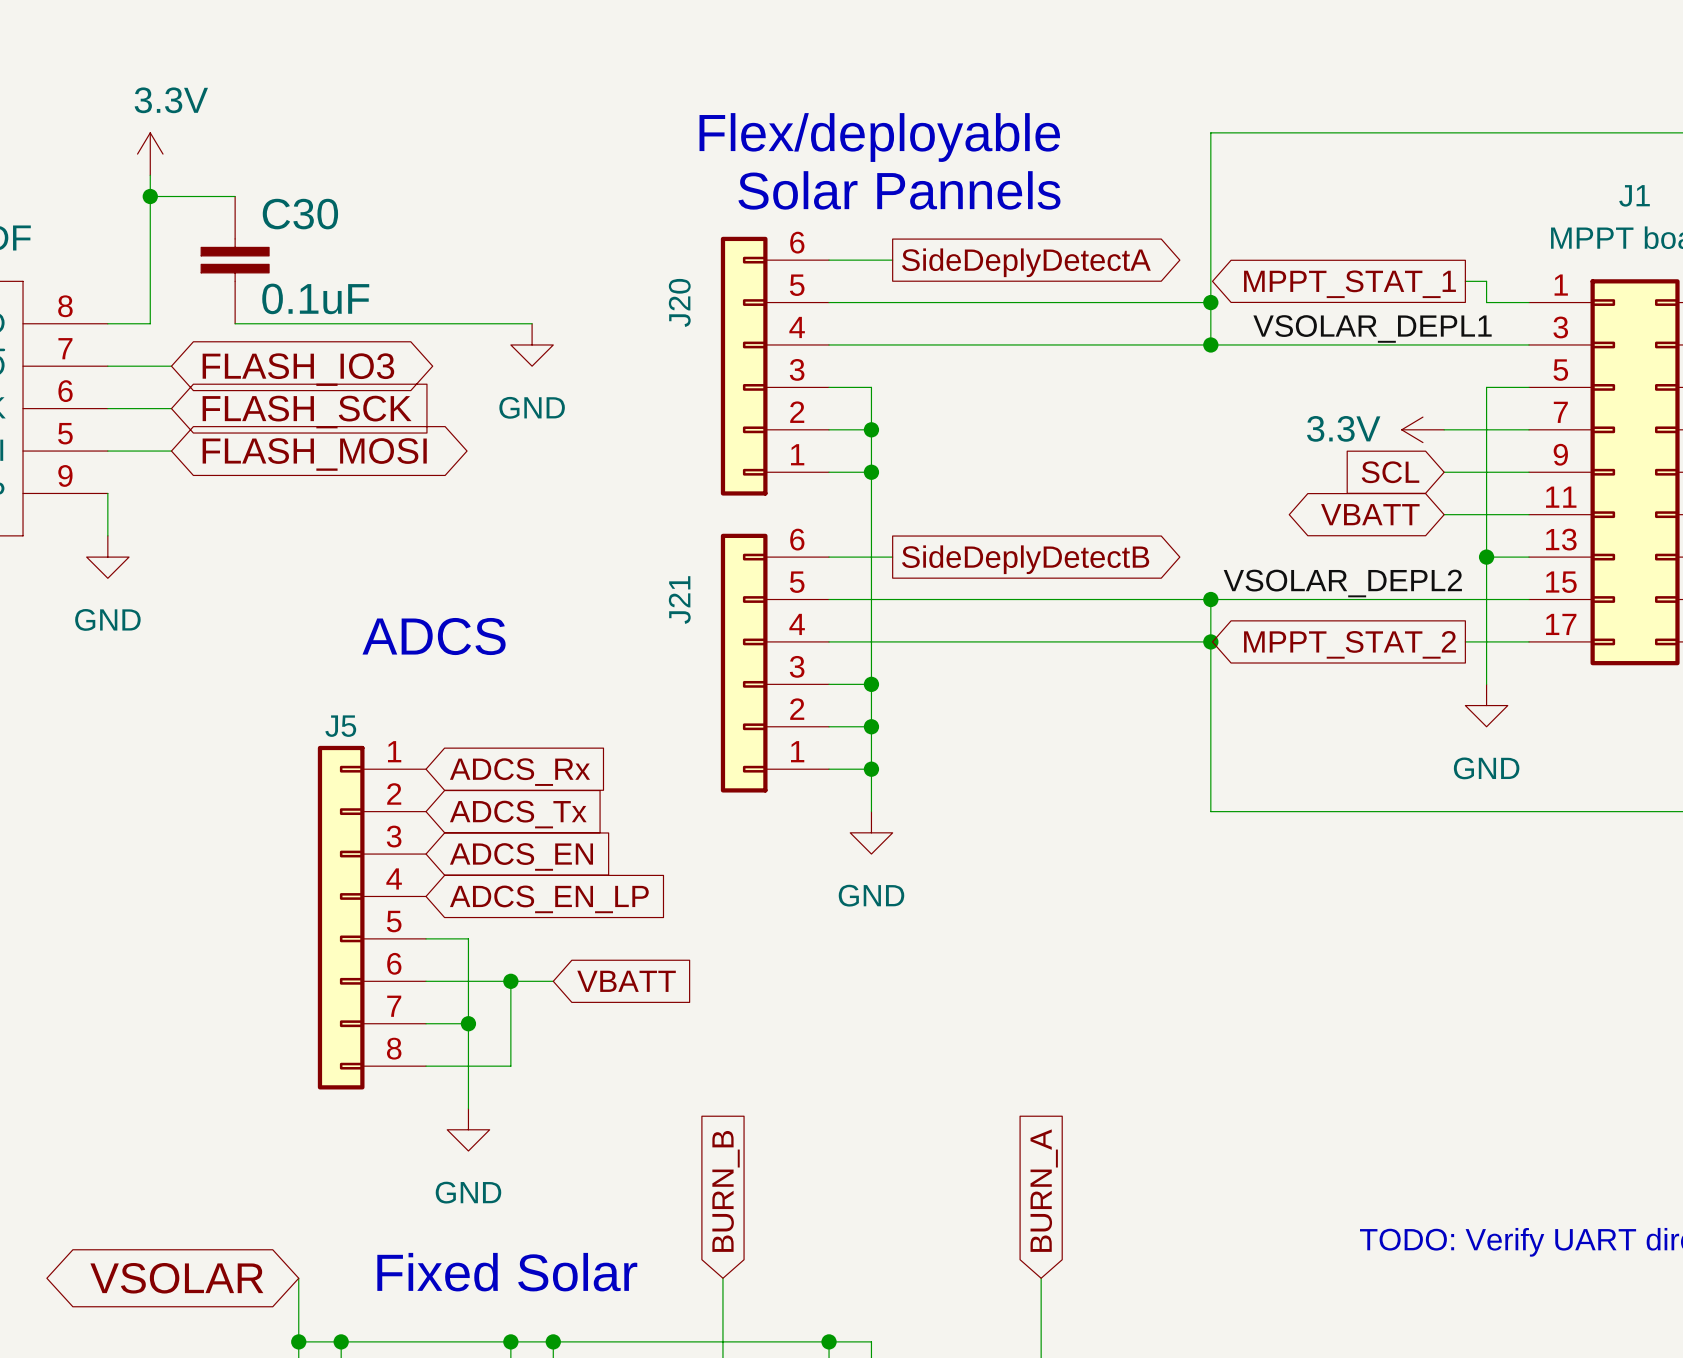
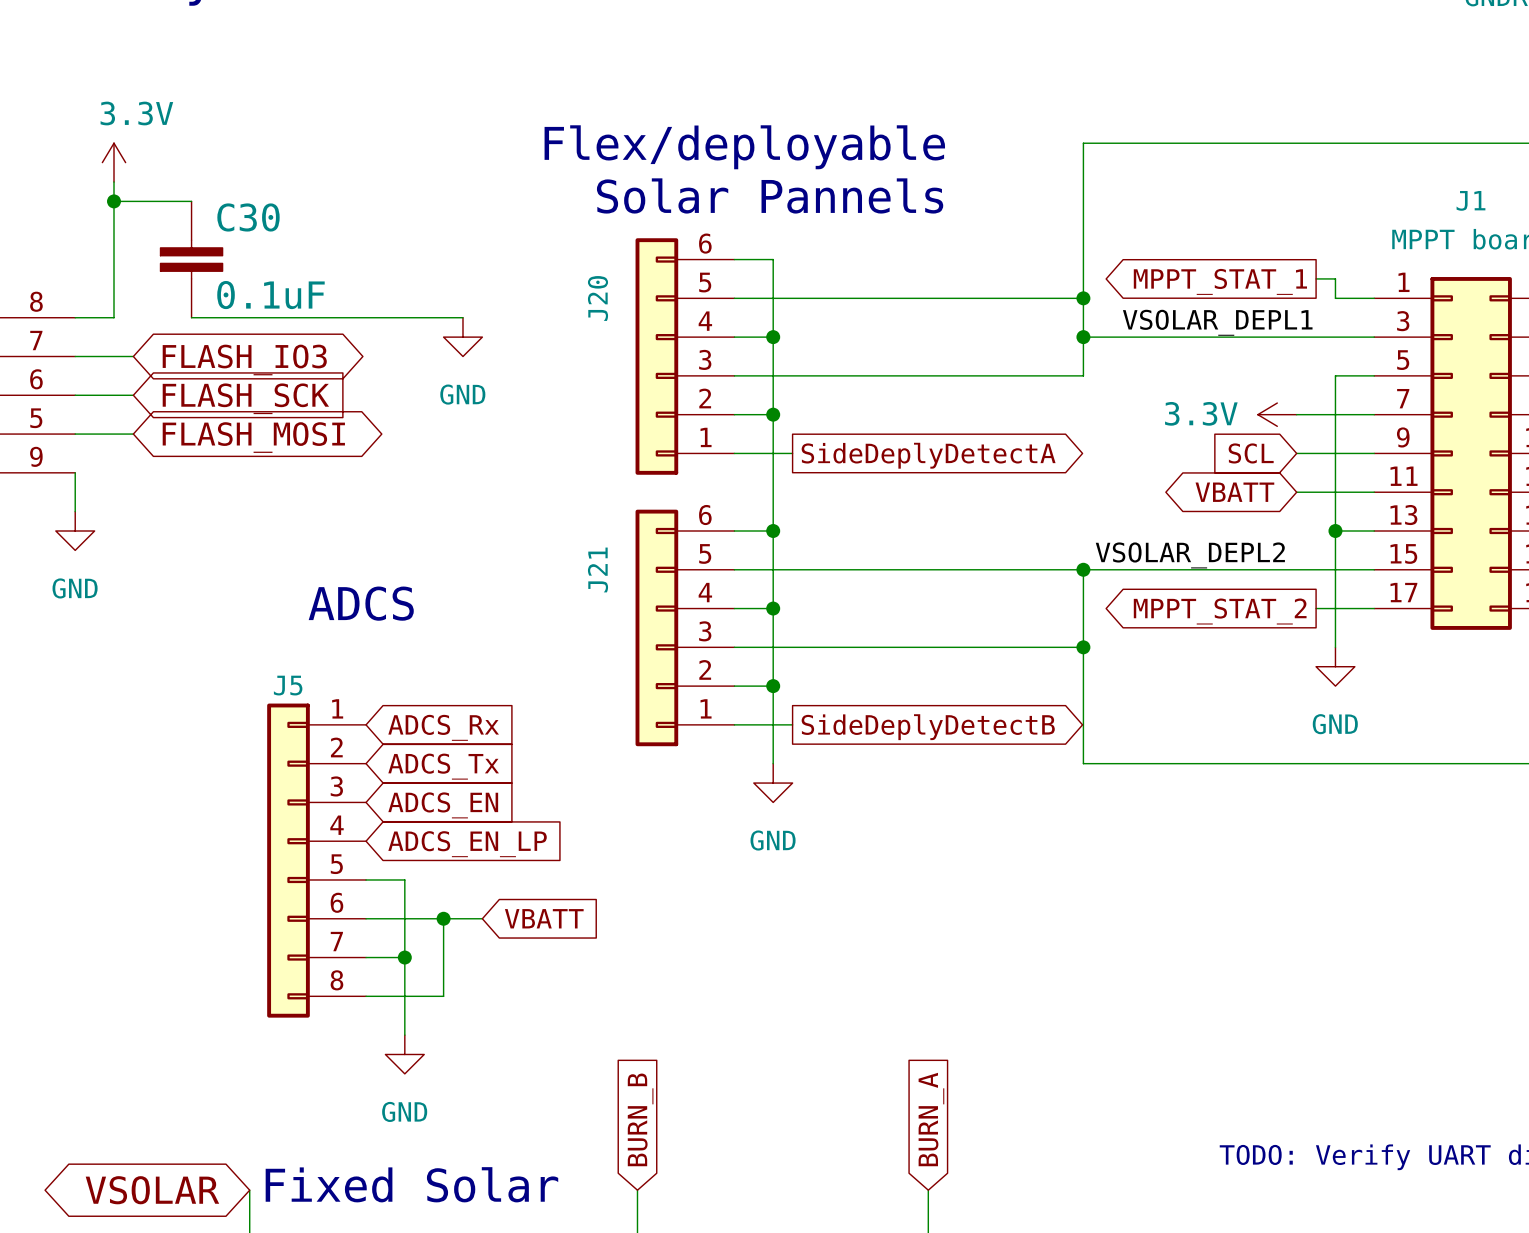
wire: (871, 260) (892, 260) -> (773, 453) (792, 453)
global label position: SideDeplyDetectA (1026, 262) -> SideDeplyDetectA (928, 455)
wire: (871, 344) (1210, 344) -> (773, 259) (773, 375) (1083, 375) (1083, 337)
junction: none -> (773, 337)
junction: (871, 472) -> none
wire: (871, 557) (892, 557) -> (773, 724) (792, 724)
junction: none -> (773, 531)
global label position: SideDeplyDetectB (1025, 559) -> SideDeplyDetectB (928, 727)
wire: (871, 641) (1210, 641) -> (773, 647) (1083, 647)
junction position: (1210, 641) -> (1083, 647)
junction position: (871, 684) -> (773, 608)
junction: (871, 769) -> none

